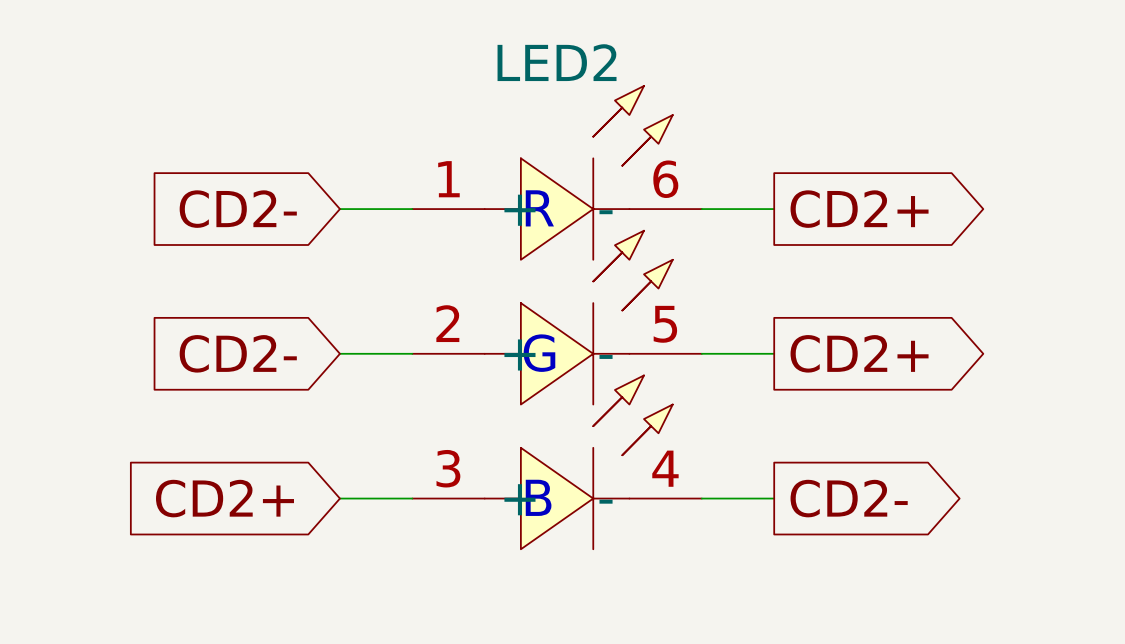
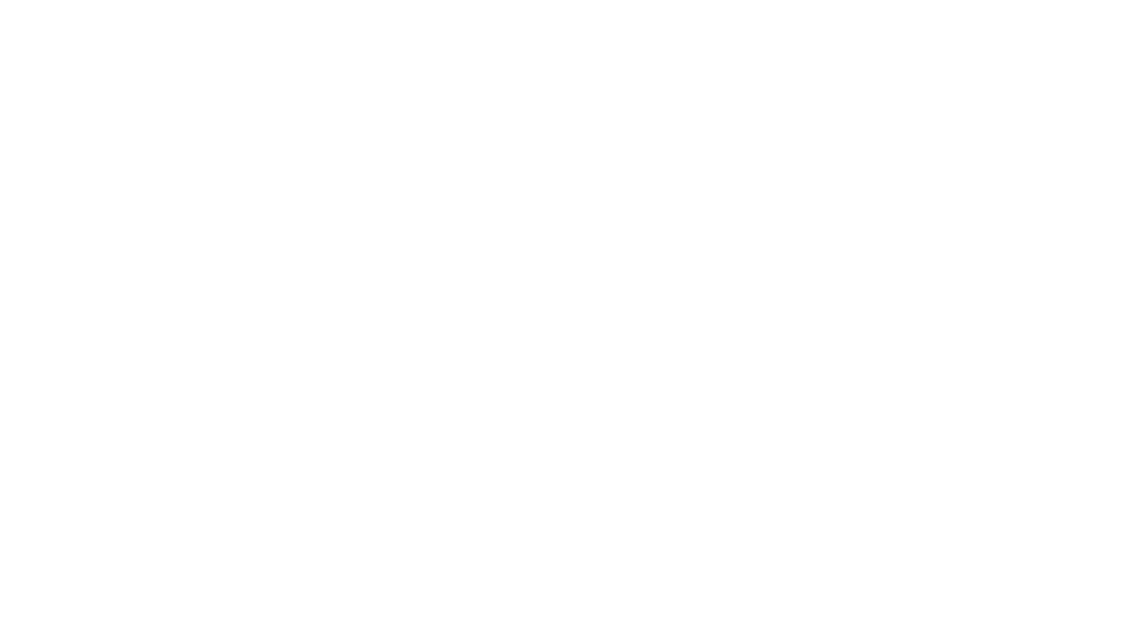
text: R (539, 208) -> none
global label: CD2- (238, 209) -> none
wire: (339, 209) (412, 209) -> none
wire: (701, 209) (774, 209) -> none
global label: CD2+ (859, 209) -> none
LED2: (557, 317) -> none
global label: CD2- (238, 353) -> none
wire: (339, 353) (412, 353) -> none
text: G (539, 353) -> none
wire: (701, 353) (774, 353) -> none
global label: CD2+ (859, 353) -> none
text: B (538, 497) -> none
global label: CD2+ (224, 498) -> none
wire: (339, 498) (412, 498) -> none
wire: (701, 498) (774, 498) -> none
global label: CD2- (849, 498) -> none

